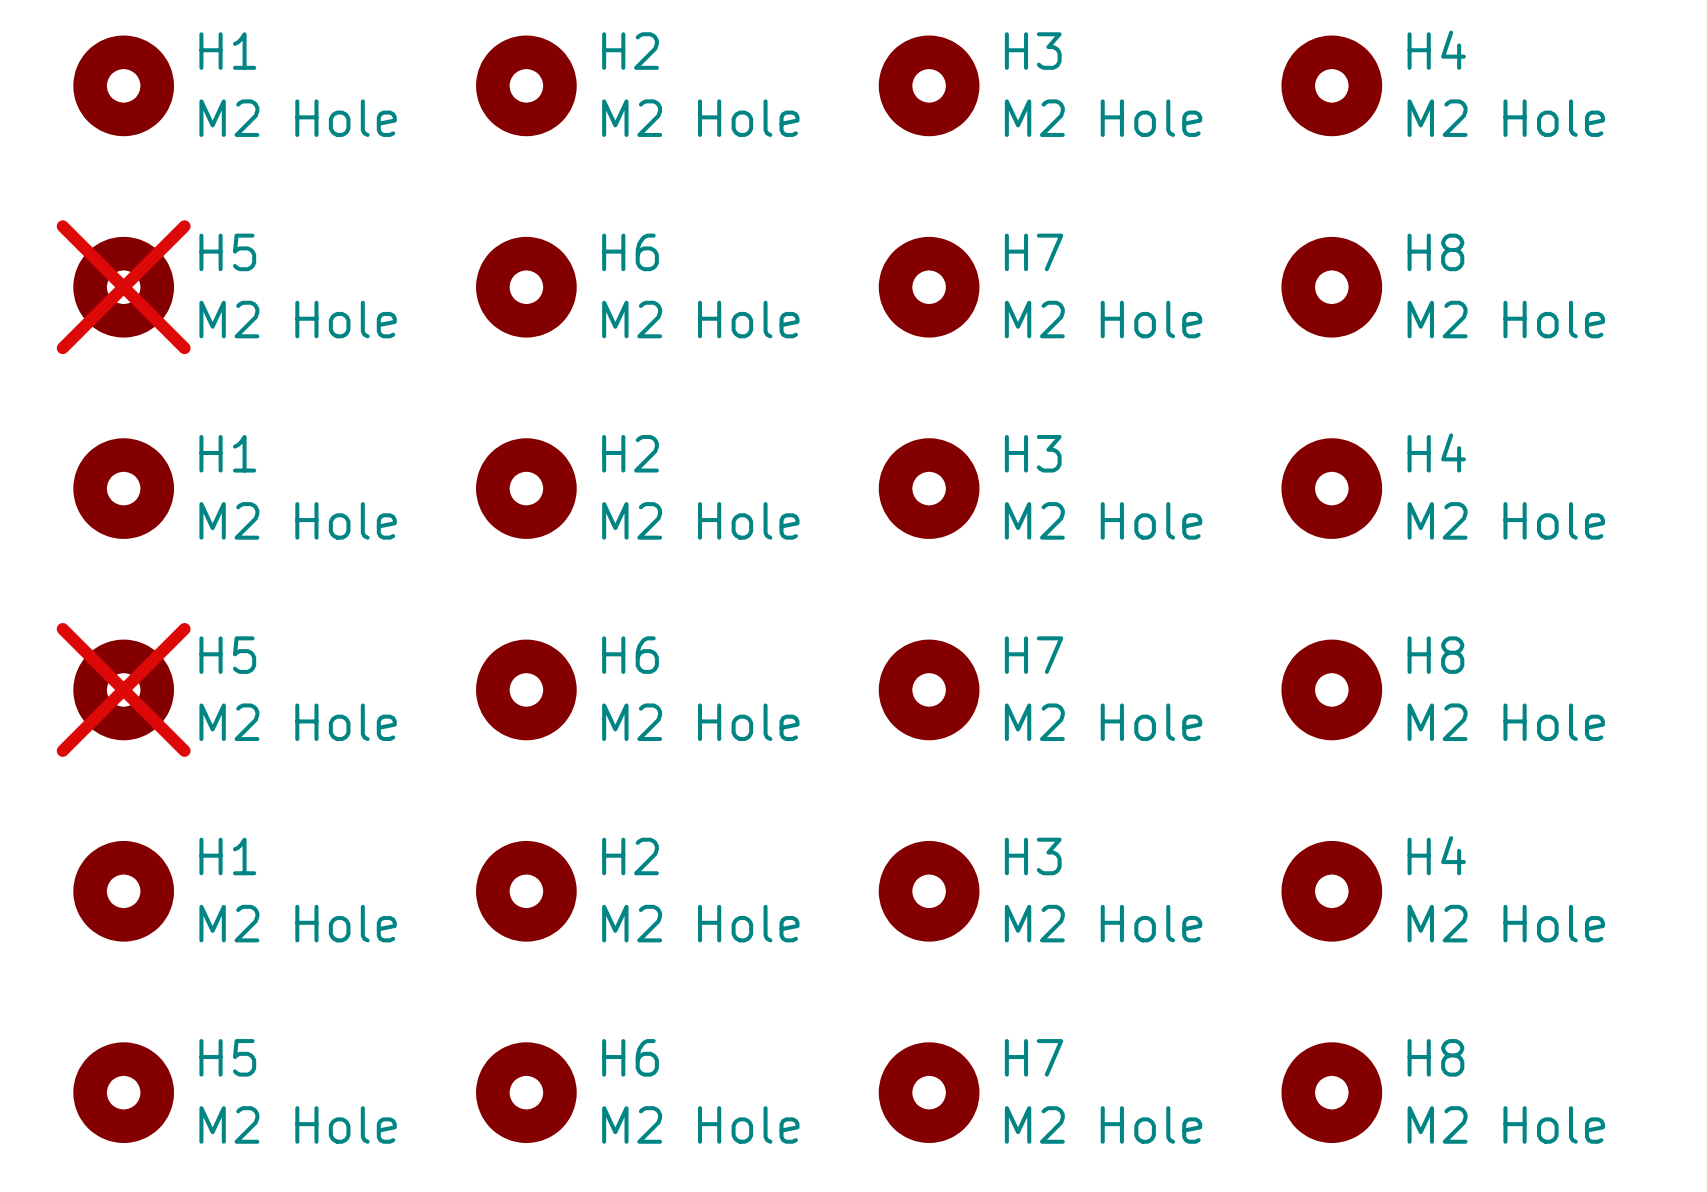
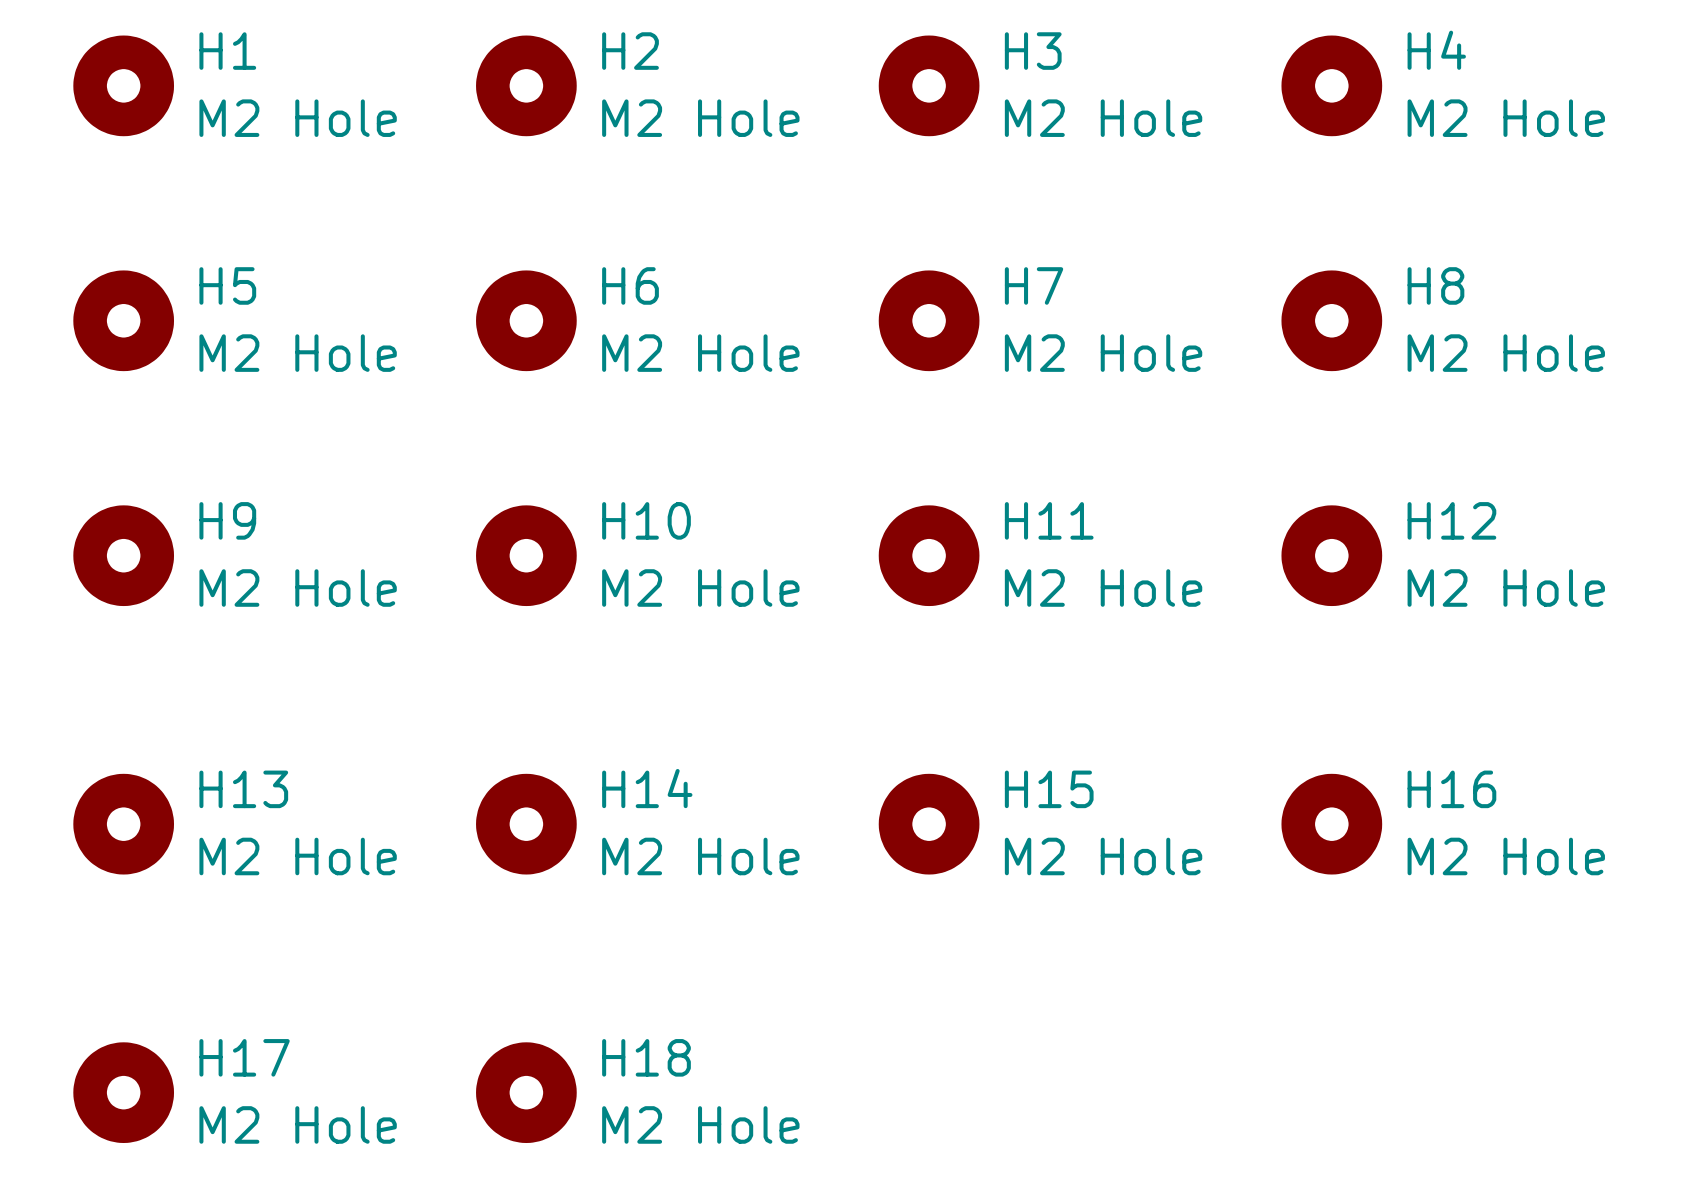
H5 position: (123, 287) -> (123, 320)
H5 do-not-place cross: (123, 287) -> none
H6 position: (526, 287) -> (526, 320)
H7 position: (929, 287) -> (929, 320)
H8 position: (1331, 287) -> (1331, 320)
H1: M2 Hole (123, 488) -> none
H2: M2 Hole (526, 488) -> none
H3: M2 Hole (929, 488) -> none
H4: M2 Hole (1331, 488) -> none
H9: none -> M2 Hole (123, 555)
H10: none -> M2 Hole (526, 555)
H11: none -> M2 Hole (929, 555)
H12: none -> M2 Hole (1331, 555)
H5: M2 Hole (123, 689) -> none
H6: M2 Hole (526, 689) -> none
H7: M2 Hole (929, 689) -> none
H8: M2 Hole (1331, 689) -> none
H13: none -> M2 Hole (123, 824)
H14: none -> M2 Hole (526, 824)
H15: none -> M2 Hole (929, 824)
H16: none -> M2 Hole (1331, 824)
H1: M2 Hole (123, 891) -> none
H2: M2 Hole (526, 891) -> none
H3: M2 Hole (929, 891) -> none
H4: M2 Hole (1331, 891) -> none
H5 name: H5 (227, 1057) -> H17 (244, 1057)
H6 name: H6 (630, 1057) -> H18 (646, 1057)
H7: M2 Hole (929, 1092) -> none
H8: M2 Hole (1331, 1092) -> none

